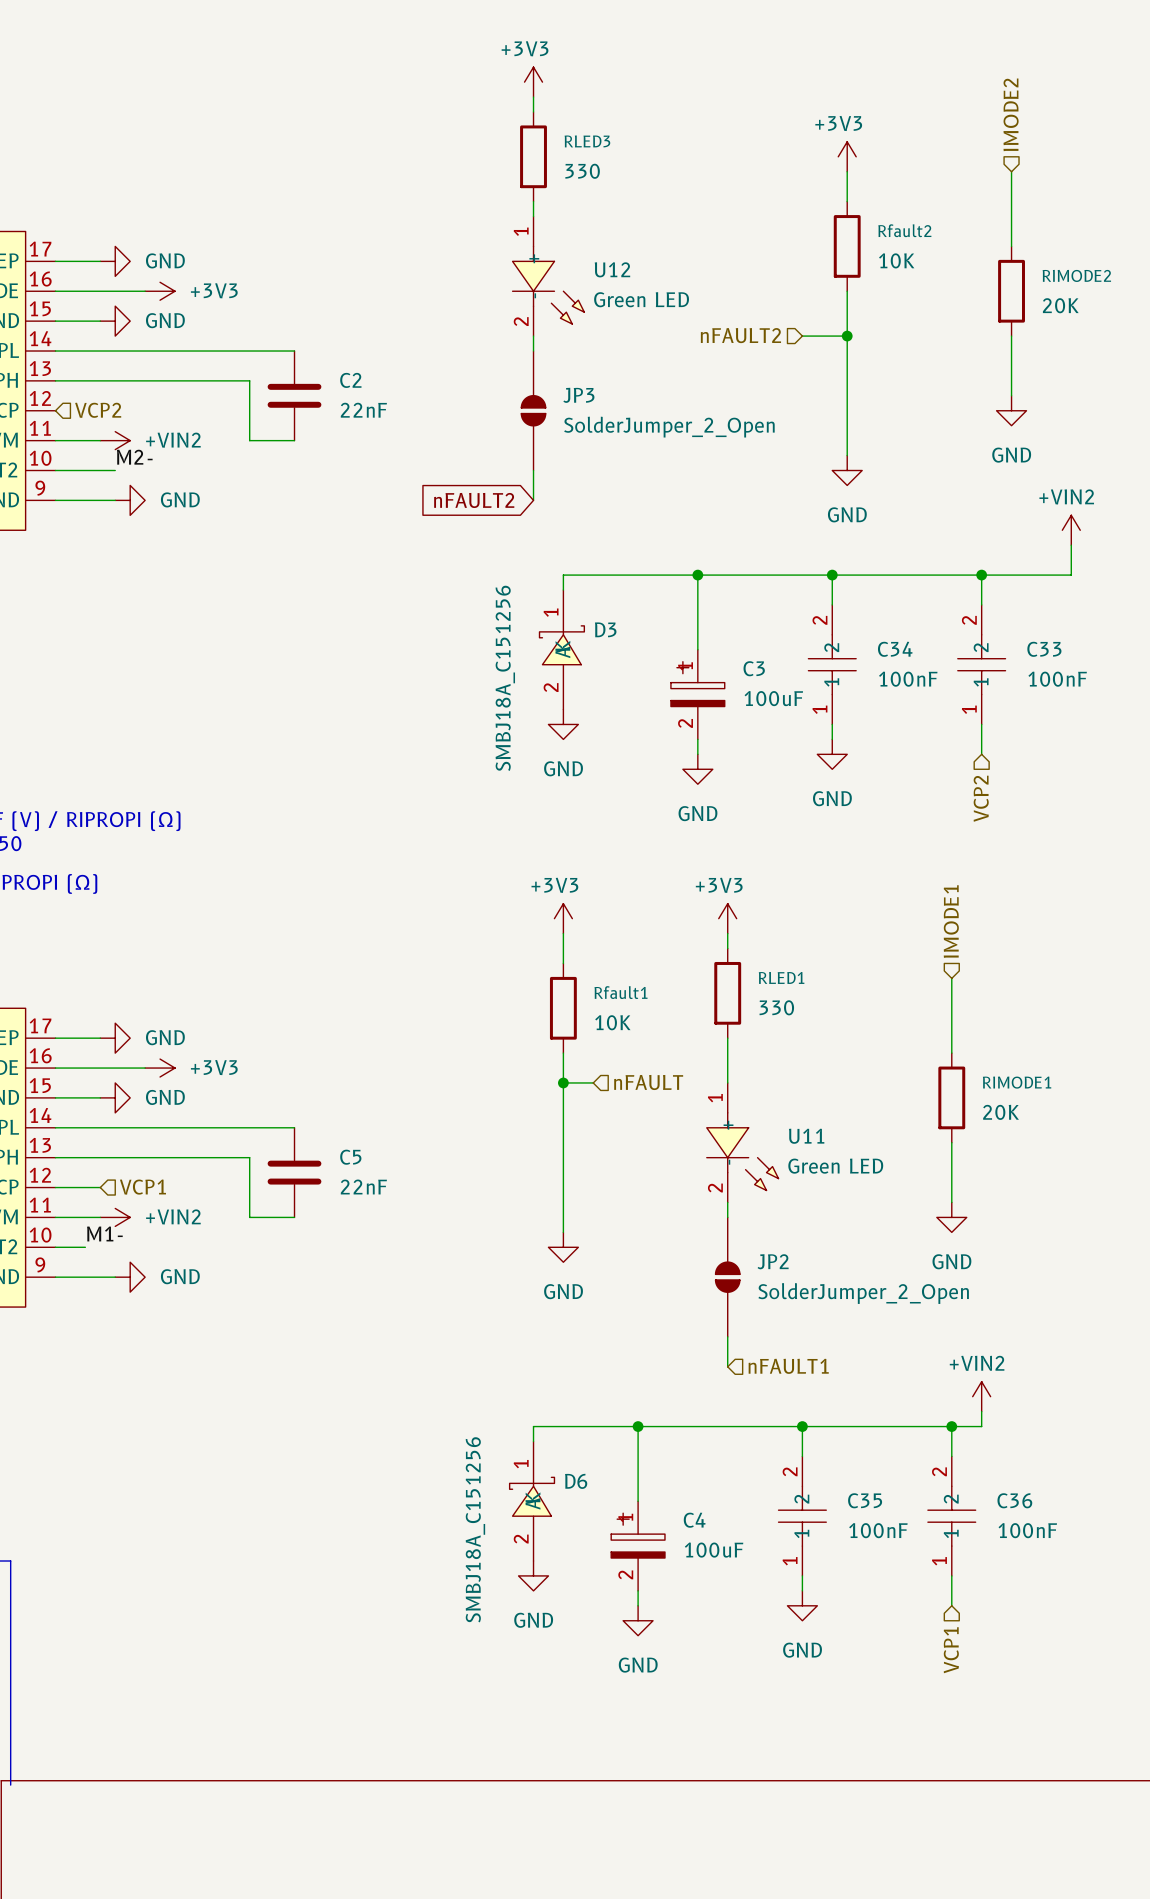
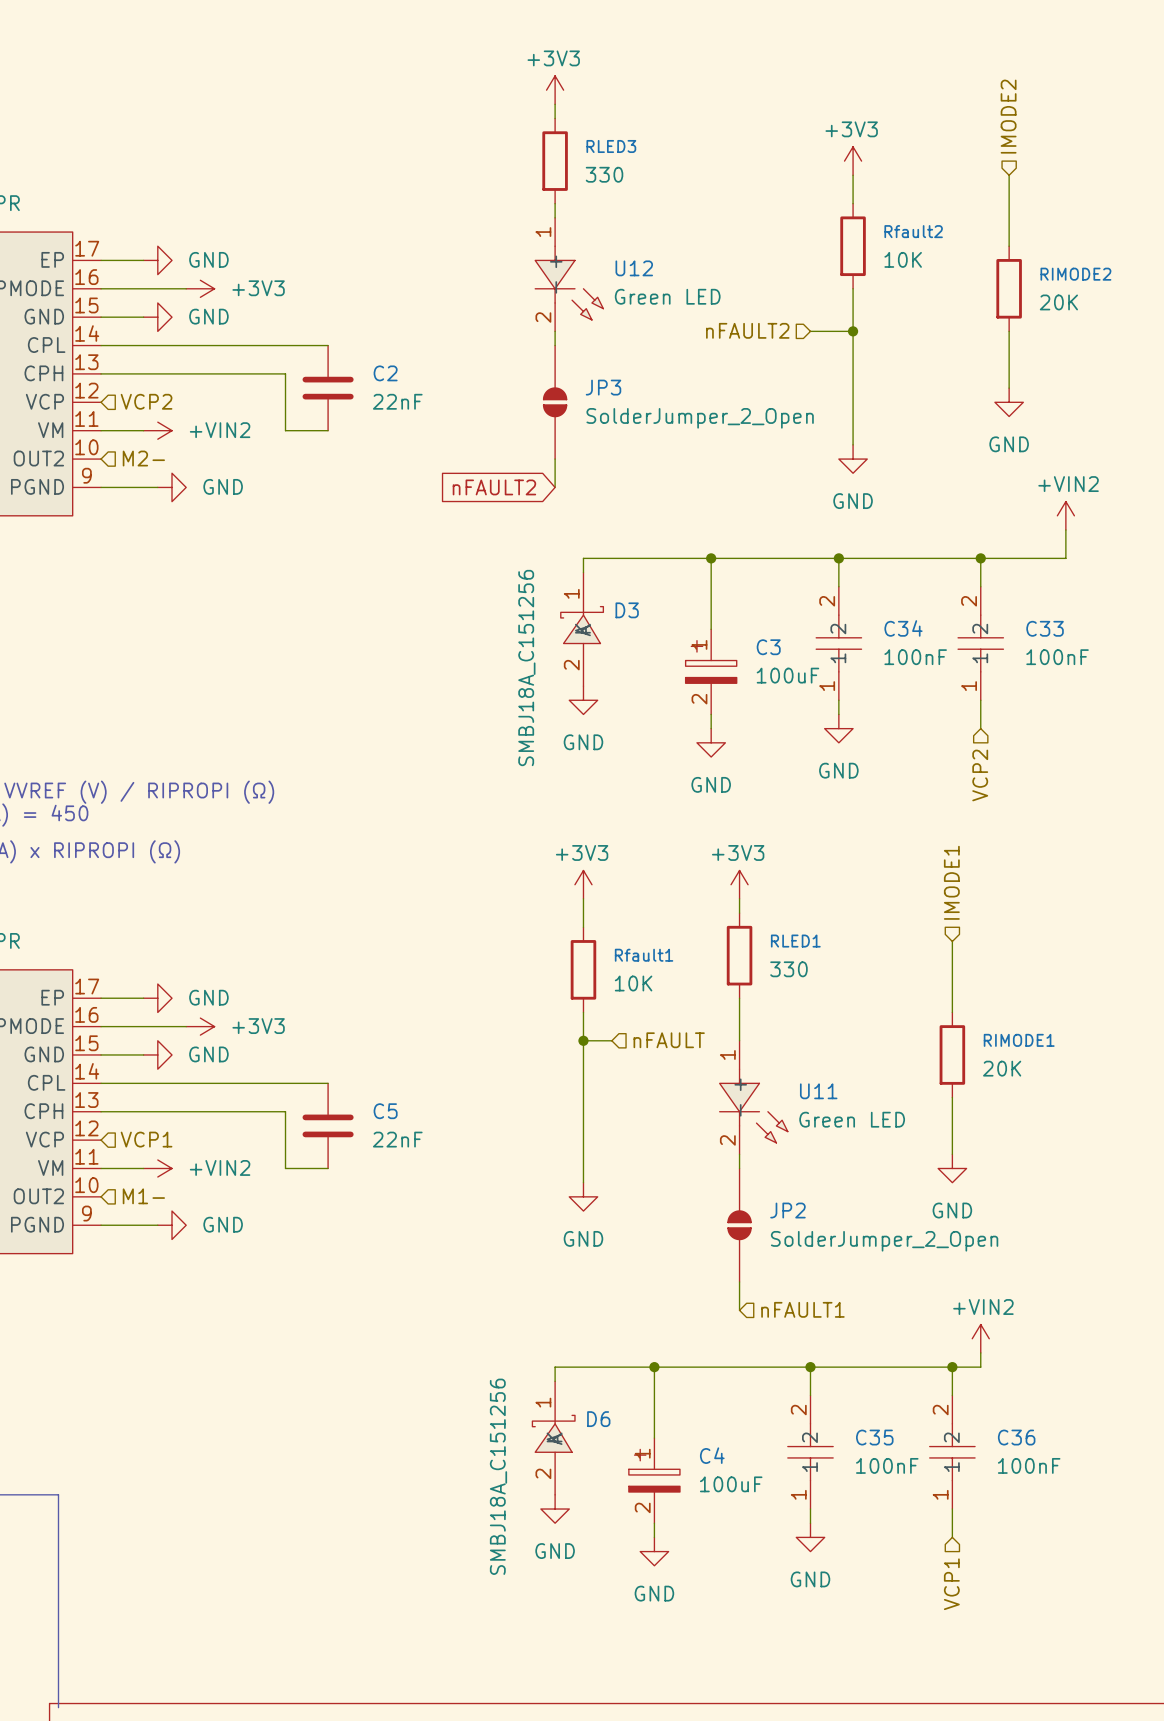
label: M2- (134, 457) -> none
hierarchical label: none -> M2- (143, 458)
wire: (55, 470) (115, 470) -> none
wire: (55, 1187) (100, 1187) -> none
hierarchical label position: VCP1 (142, 1187) -> VCP1 (146, 1139)
label: M1- (104, 1233) -> none
hierarchical label: none -> M1- (143, 1196)
wire: (55, 1247) (85, 1247) -> none

